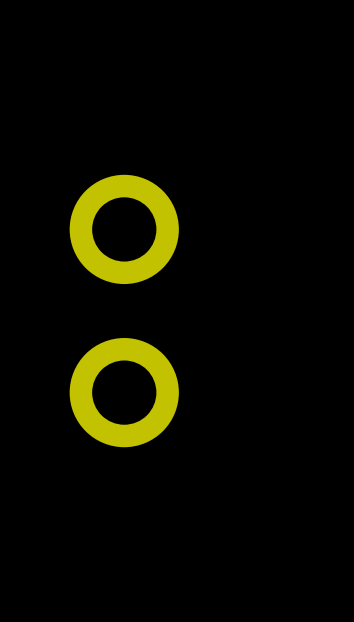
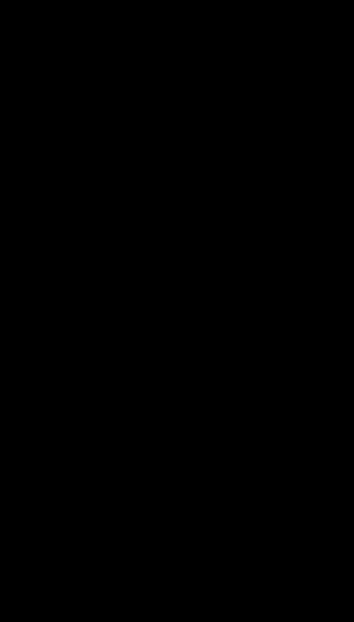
part: (124, 311) -> none

